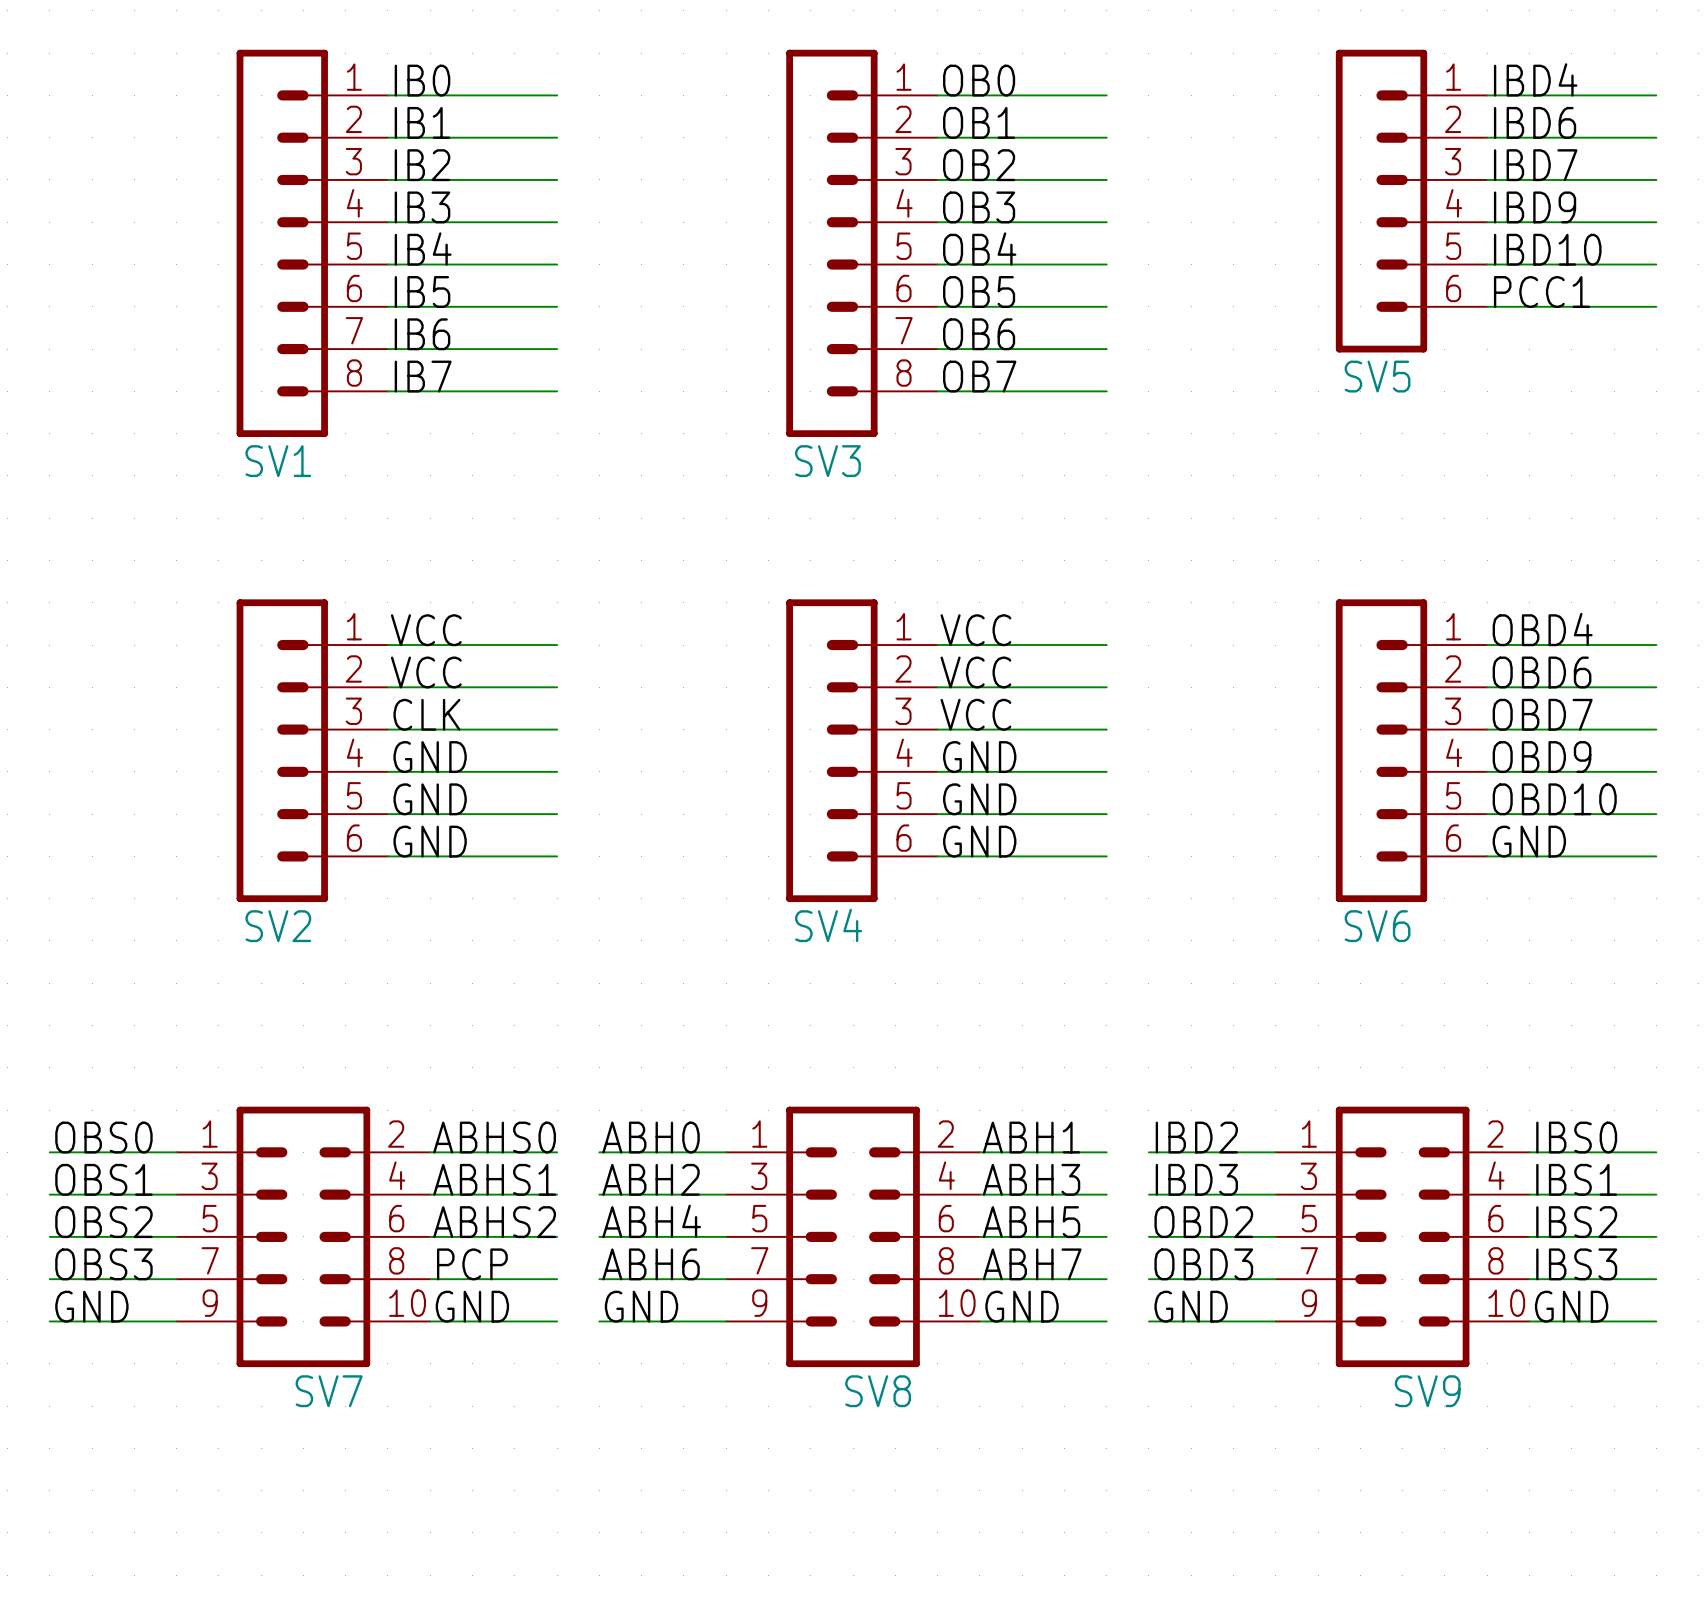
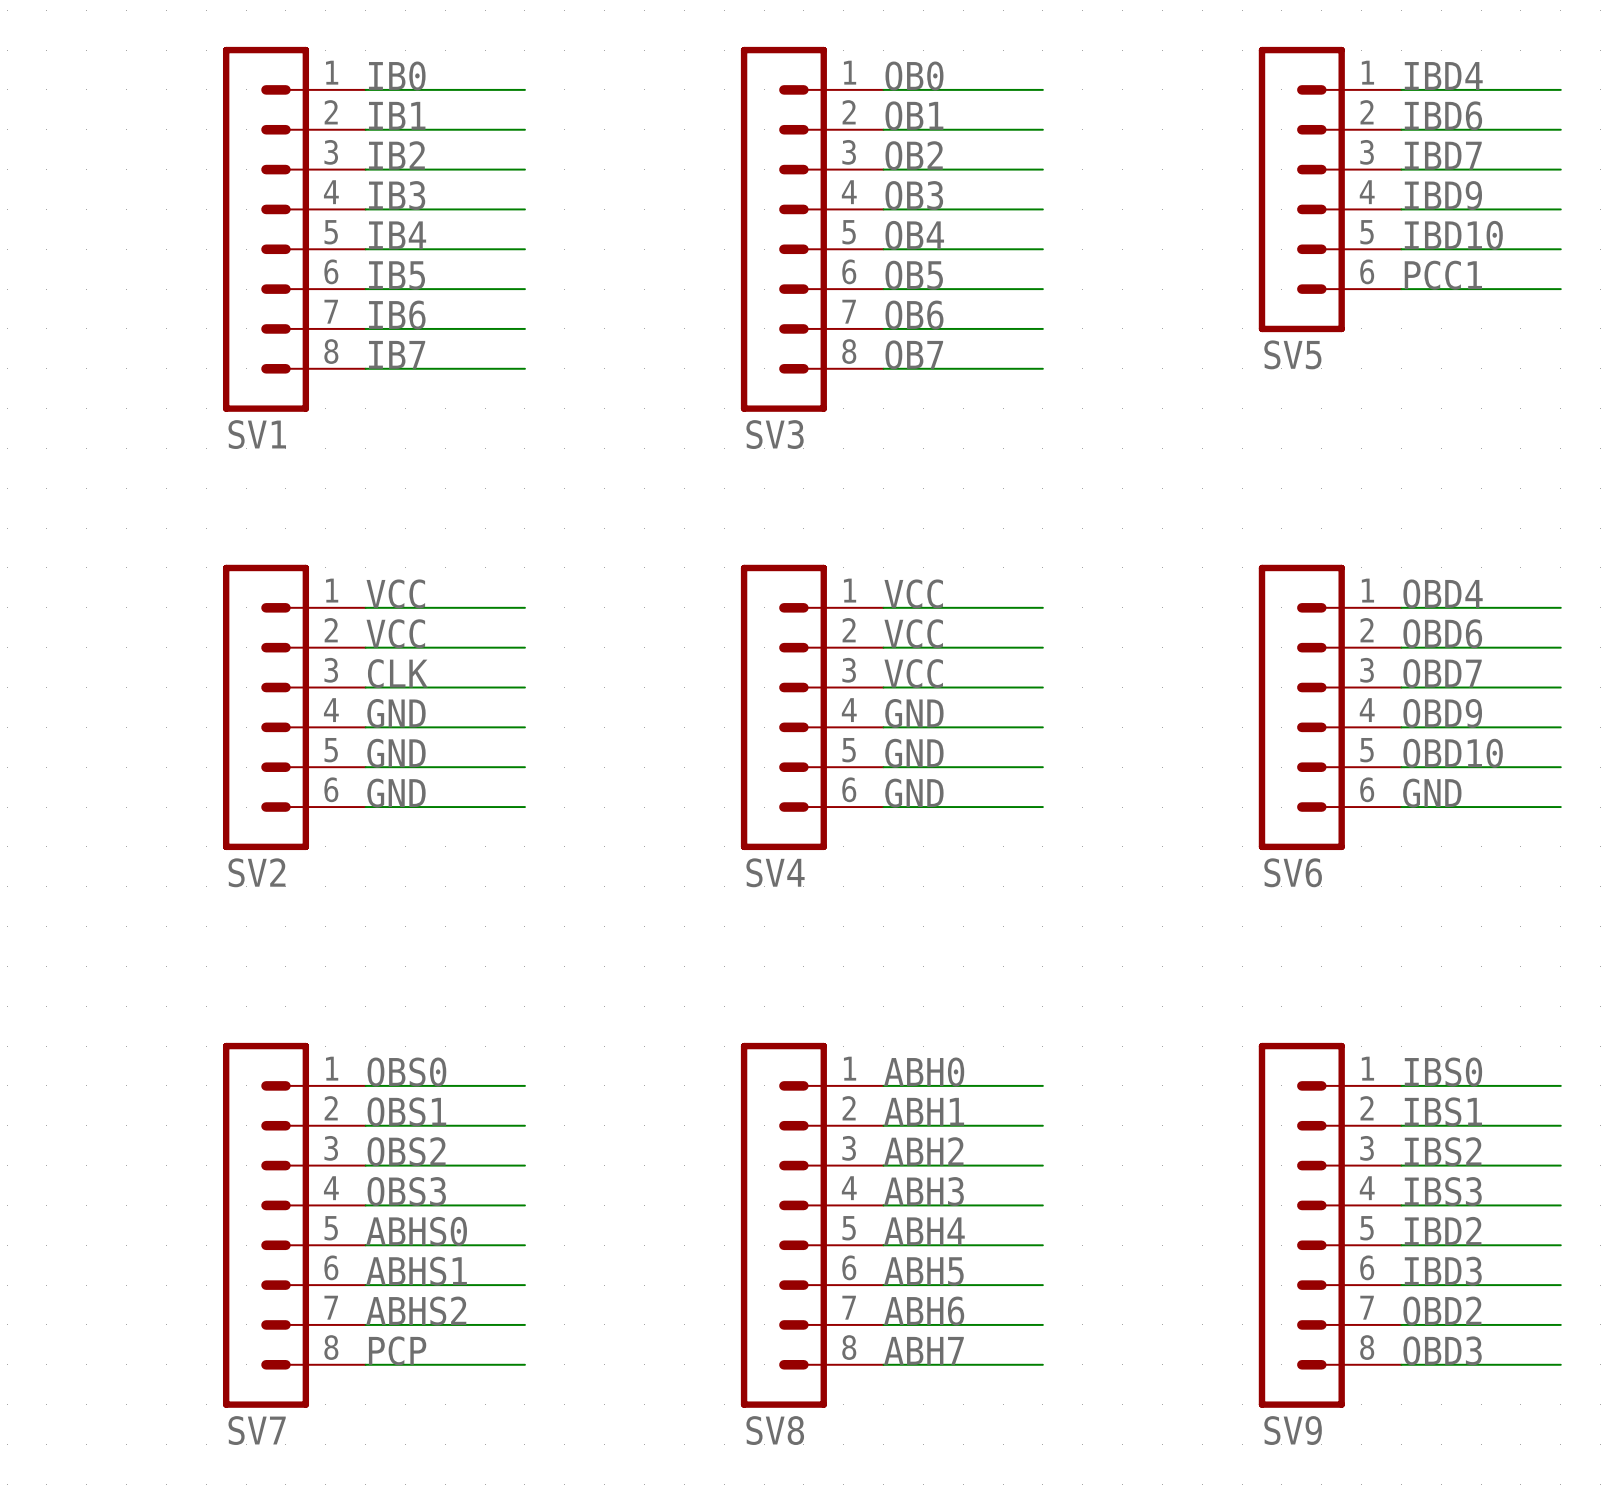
SV7 symbol: [176, 1106, 431, 1368] -> [222, 1042, 366, 1408]
SV8 symbol: [726, 1106, 980, 1368] -> [740, 1042, 884, 1408]
SV9 symbol: [1275, 1106, 1530, 1368] -> [1258, 1042, 1402, 1408]
label position: OBS0 (103, 1137) -> OBS0 (406, 1071)
label position: ABHS0 (494, 1137) -> ABHS0 (416, 1231)
label position: ABH0 (651, 1137) -> ABH0 (924, 1071)
label position: ABH1 (1031, 1137) -> ABH1 (924, 1111)
label position: IBD2 (1196, 1137) -> IBD2 (1443, 1231)
label position: IBS0 (1576, 1137) -> IBS0 (1443, 1071)
wire: (49, 1152) (176, 1152) -> none
wire: (599, 1152) (726, 1152) -> none
wire: (1148, 1152) (1275, 1152) -> none
label position: OBS1 (103, 1179) -> OBS1 (406, 1111)
label position: ABHS1 (494, 1179) -> ABHS1 (416, 1271)
label position: ABH2 (651, 1179) -> ABH2 (923, 1151)
label position: ABH3 (1031, 1179) -> ABH3 (923, 1191)
label position: IBD3 (1196, 1179) -> IBD3 (1443, 1271)
label position: IBS1 (1576, 1179) -> IBS1 (1443, 1111)
wire: (49, 1194) (176, 1194) -> none
wire: (599, 1194) (726, 1194) -> none
wire: (1148, 1194) (1275, 1194) -> none
label position: ABH4 (651, 1221) -> ABH4 (924, 1231)
label position: OBS2 (103, 1222) -> OBS2 (406, 1151)
label position: ABHS2 (494, 1222) -> ABHS2 (416, 1311)
label position: ABH5 (1031, 1222) -> ABH5 (923, 1271)
label position: OBD2 (1203, 1222) -> OBD2 (1442, 1311)
label position: IBS2 (1576, 1222) -> IBS2 (1443, 1151)
wire: (49, 1236) (176, 1236) -> none
wire: (599, 1236) (726, 1236) -> none
wire: (1148, 1236) (1275, 1236) -> none
label position: OBS3 (103, 1264) -> OBS3 (406, 1191)
label position: PCP (472, 1264) -> PCP (397, 1350)
label position: ABH6 (651, 1264) -> ABH6 (924, 1311)
label position: ABH7 (1032, 1264) -> ABH7 (923, 1350)
label position: OBD3 (1203, 1264) -> OBD3 (1442, 1350)
label position: IBS3 (1576, 1264) -> IBS3 (1443, 1191)
wire: (49, 1279) (176, 1279) -> none
wire: (599, 1279) (726, 1279) -> none
wire: (1148, 1279) (1275, 1279) -> none
label: GND (91, 1306) -> none
label: GND (472, 1306) -> none
label: GND (641, 1306) -> none
label: GND (1022, 1306) -> none
label: GND (1191, 1306) -> none
label: GND (1571, 1306) -> none
wire: (49, 1321) (176, 1321) -> none
wire: (599, 1321) (726, 1321) -> none
wire: (1148, 1321) (1275, 1321) -> none
wire: none -> (365, 1285) (524, 1285)
wire: none -> (883, 1285) (1042, 1285)
wire: none -> (1401, 1285) (1560, 1285)
SV7 name position: SV7 (329, 1391) -> SV7 (257, 1430)
SV8 name position: SV8 (878, 1391) -> SV8 (775, 1430)
SV9 name position: SV9 (1427, 1391) -> SV9 (1293, 1430)
wire: none -> (365, 1324) (524, 1324)
wire: none -> (883, 1324) (1042, 1324)
wire: none -> (1401, 1324) (1560, 1324)
wire: none -> (365, 1364) (524, 1364)
wire: none -> (883, 1364) (1042, 1364)
wire: none -> (1401, 1364) (1560, 1364)

